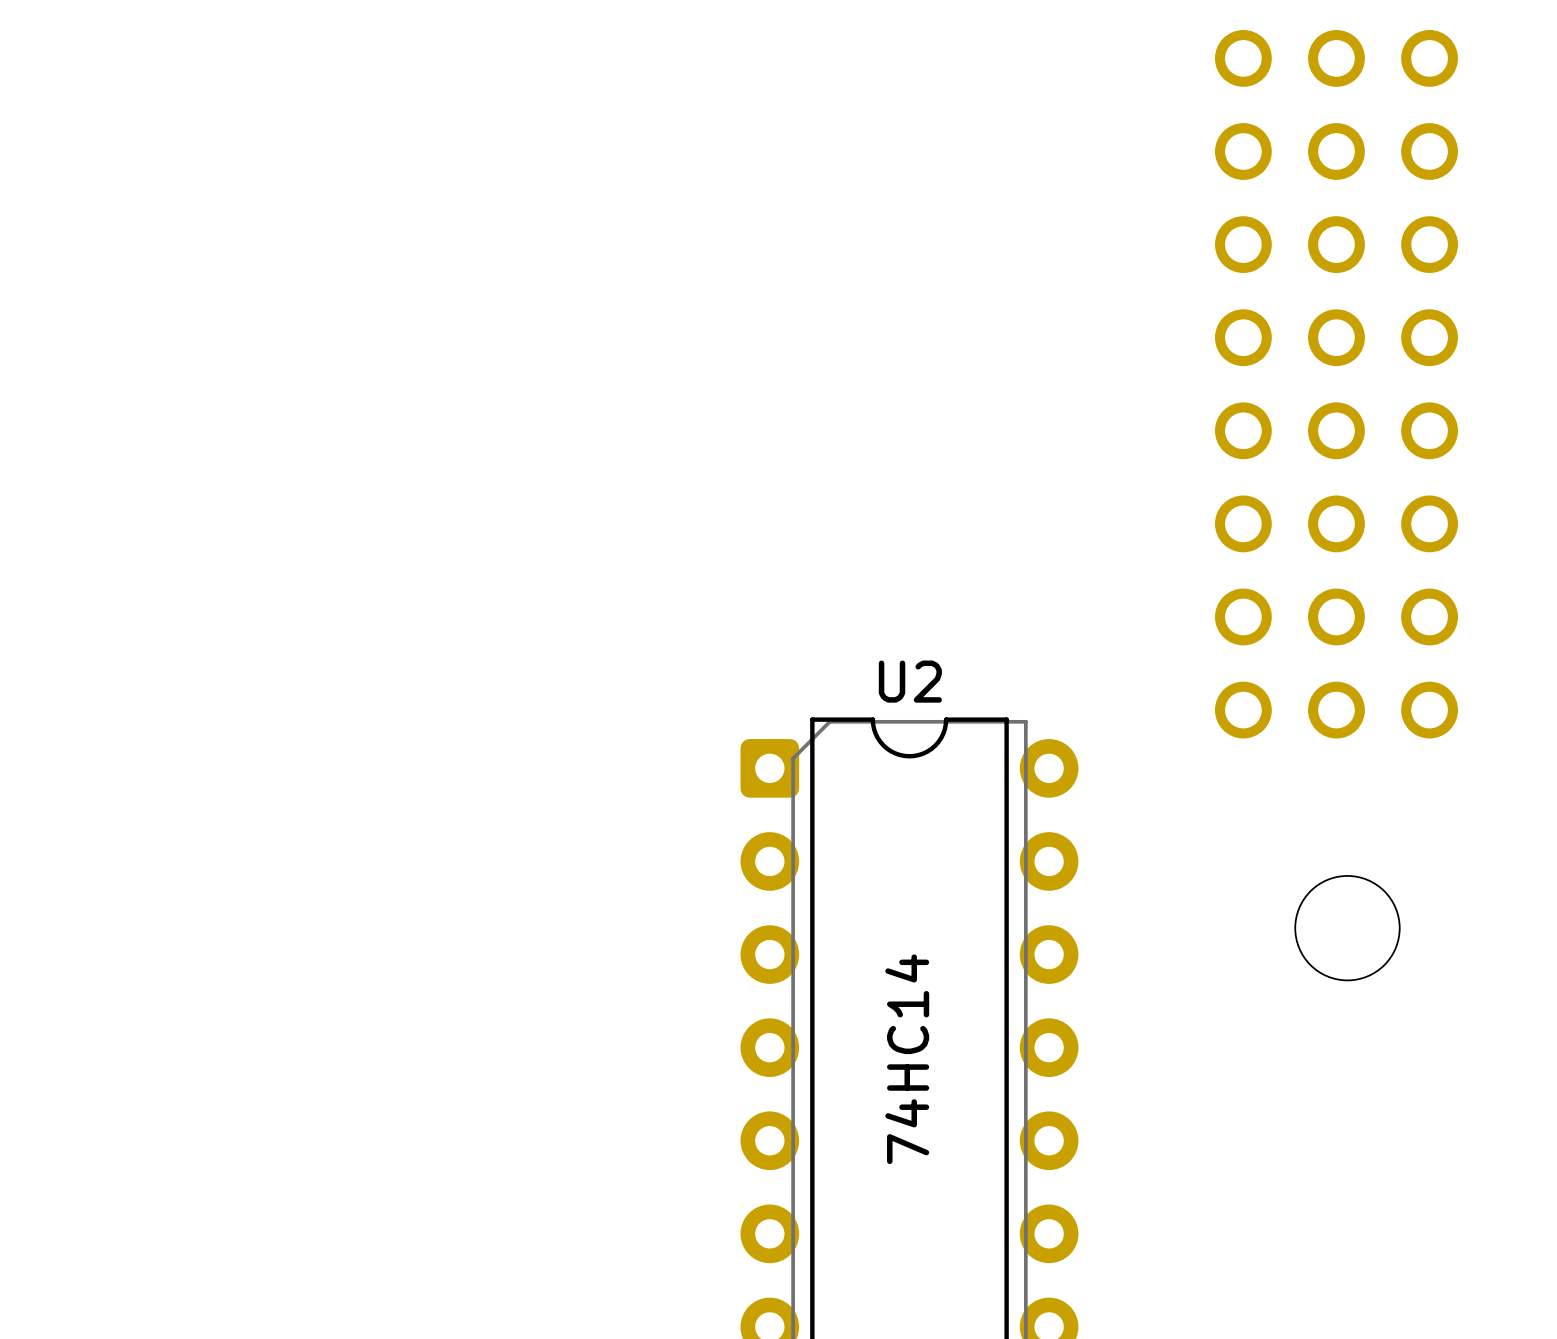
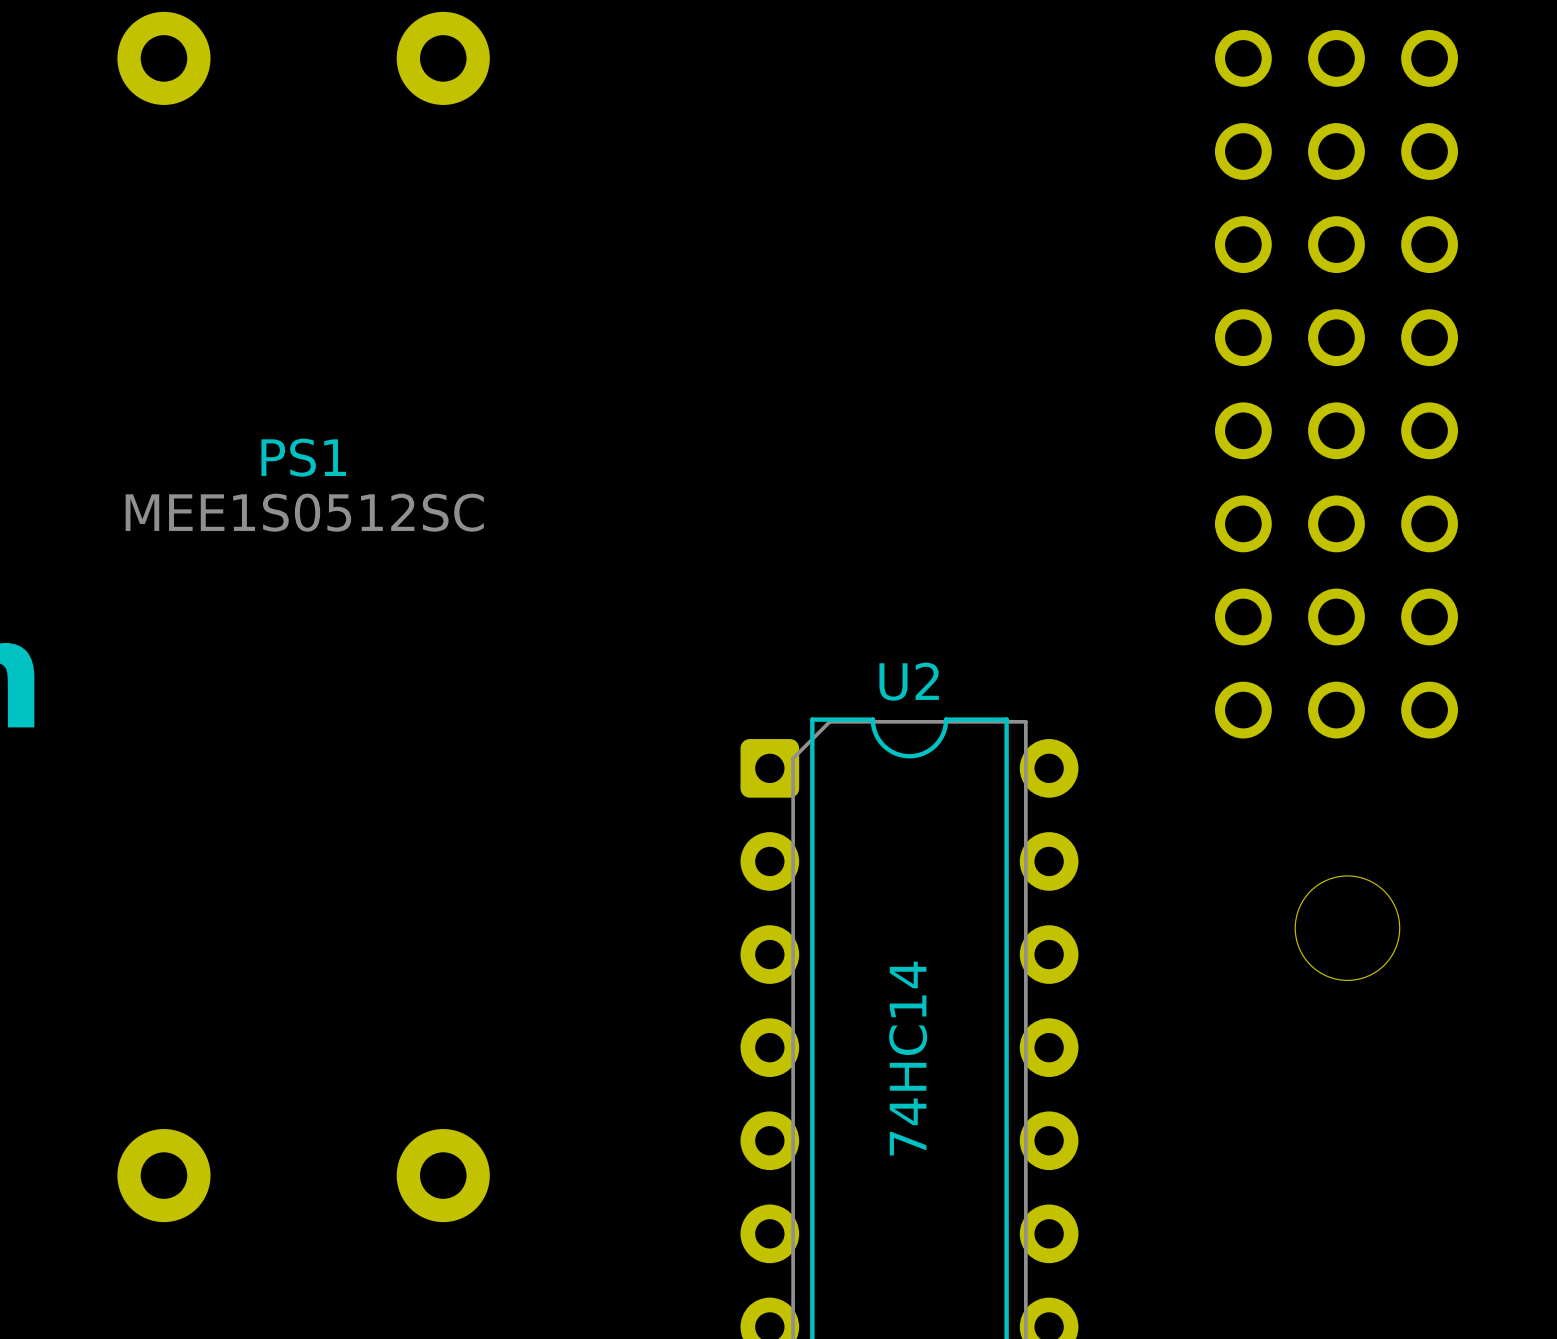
PS1: none -> MEE1S0512SC (303, 616)

